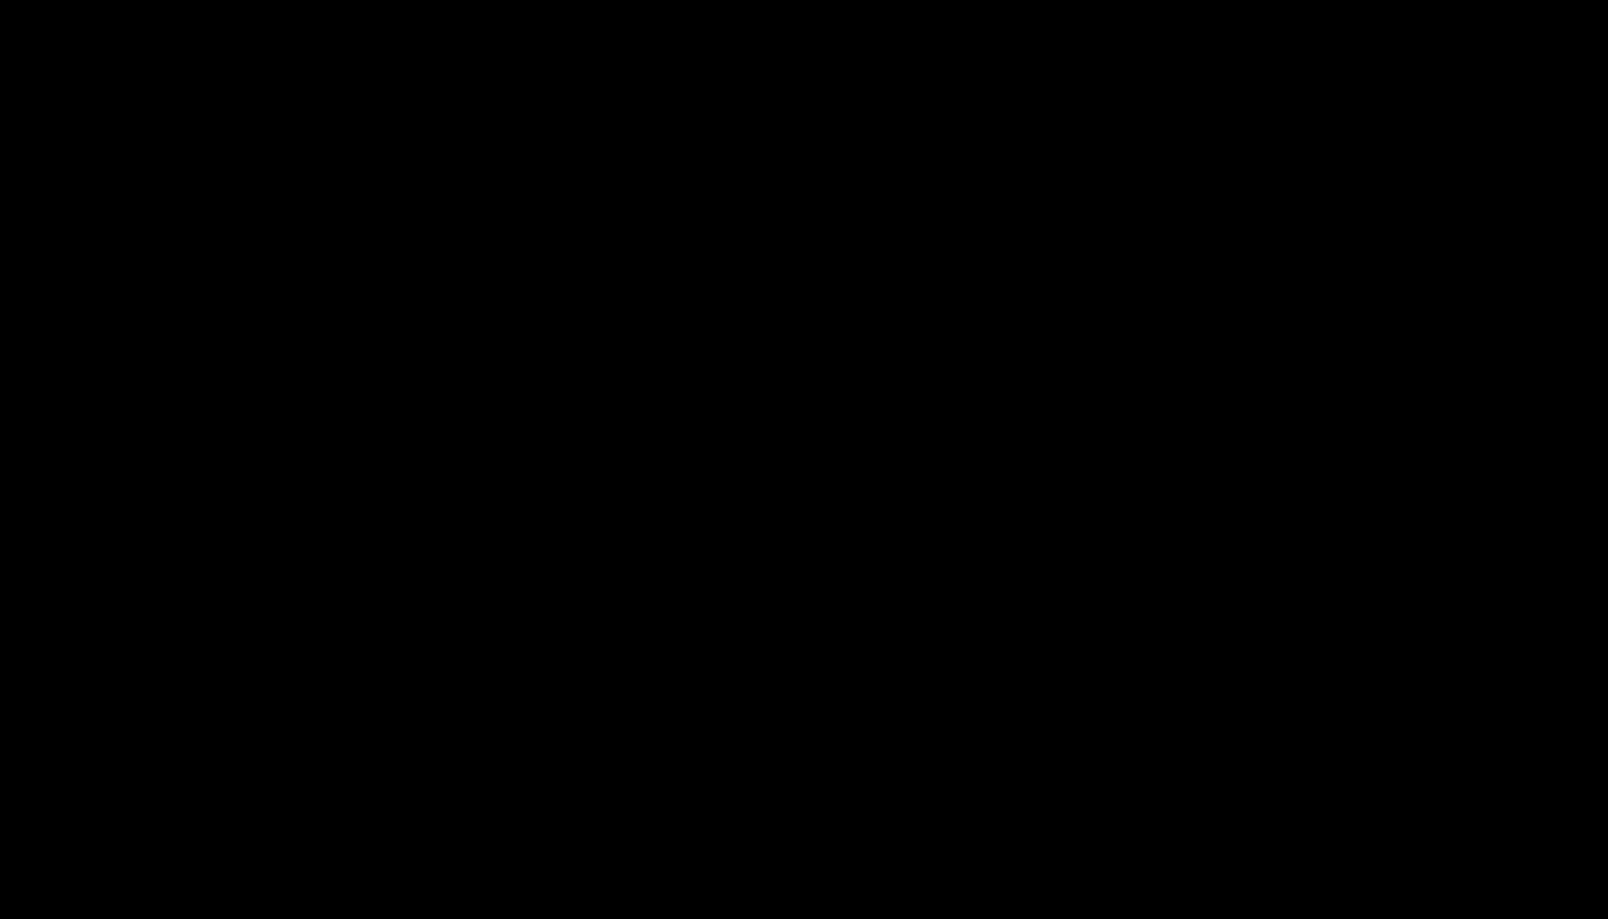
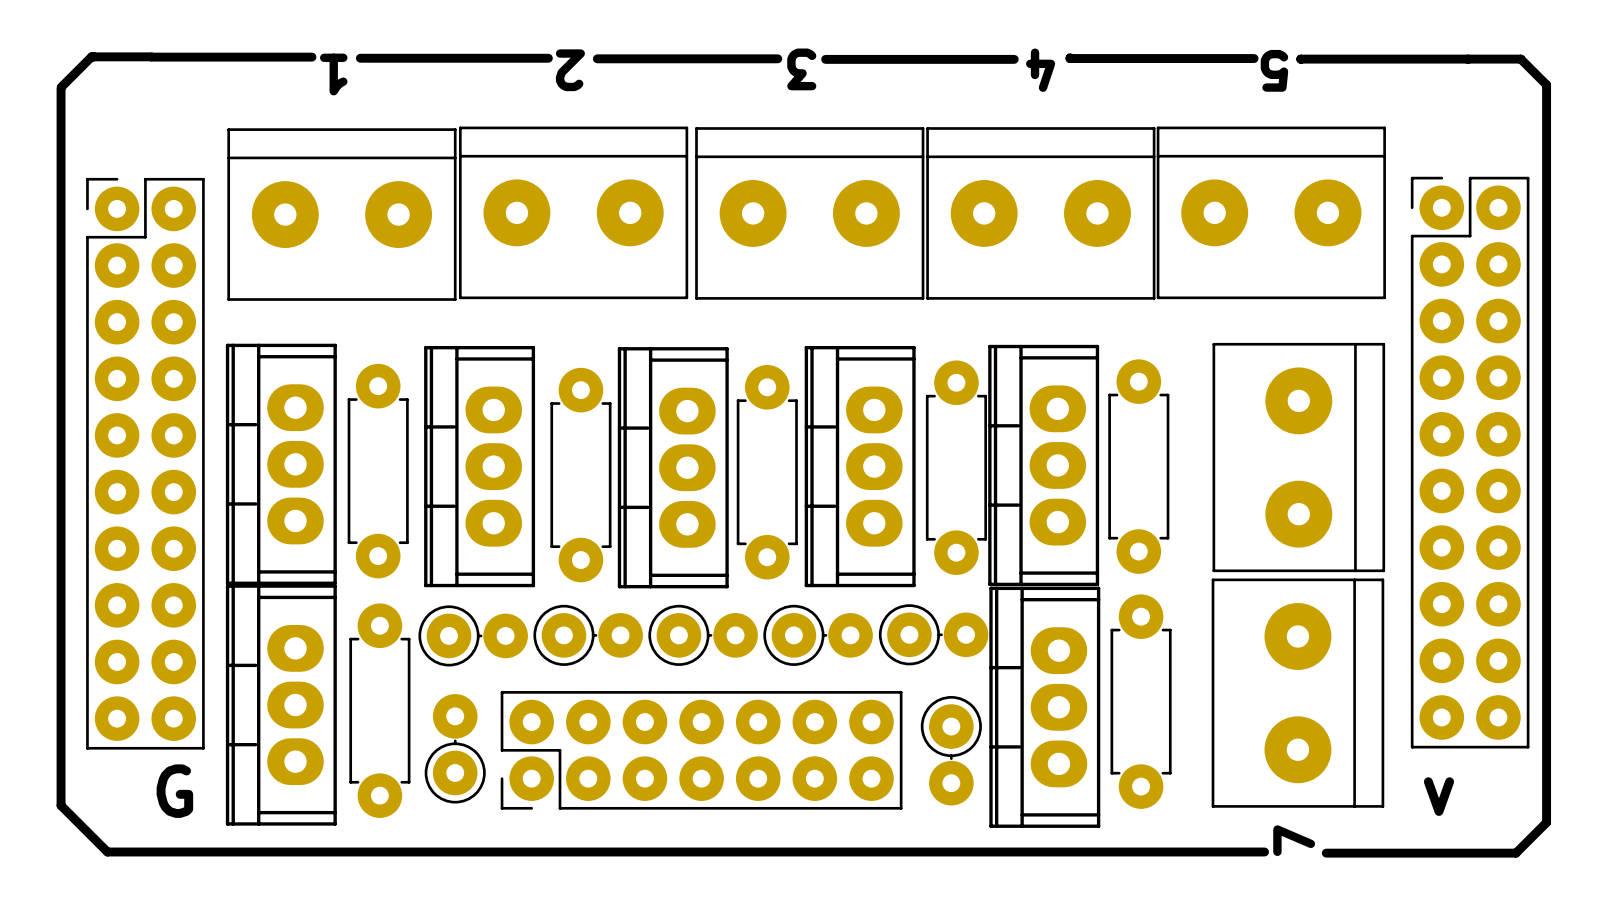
line: none -> (151, 56) (91, 56) (61, 87)
line: none -> (151, 57) (311, 57)
line: none -> (1070, 57) (1254, 58)
line: none -> (360, 58) (548, 58)
line: none -> (597, 58) (777, 58)
line: none -> (825, 59) (1014, 59)
line: none -> (1300, 59) (1520, 59) (1546, 84) (1546, 822) (1516, 853) (1326, 853)
text: none -> 3 (801, 69)
text: none -> 4 (1040, 70)
text: none -> 2 (570, 70)
text: none -> 5 (1274, 70)
text: none -> 1 (333, 74)
line: none -> (61, 88) (61, 805) (107, 851) (1264, 851)
part: none -> (573, 212)
part: none -> (1271, 212)
part: none -> (809, 213)
part: none -> (1040, 213)
part: none -> (341, 214)
part: none -> (1298, 457)
part: none -> (1470, 462)
part: none -> (145, 463)
part: none -> (281, 464)
part: none -> (1043, 465)
part: none -> (479, 466)
part: none -> (860, 466)
part: none -> (1138, 466)
part: none -> (673, 467)
part: none -> (956, 467)
part: none -> (378, 471)
part: none -> (767, 472)
part: none -> (580, 475)
part: none -> (933, 634)
part: none -> (473, 635)
part: none -> (588, 635)
part: none -> (703, 635)
part: none -> (818, 635)
part: none -> (1297, 693)
part: none -> (1141, 701)
part: none -> (281, 705)
part: none -> (1044, 707)
part: none -> (379, 710)
part: none -> (455, 748)
part: none -> (701, 750)
part: none -> (951, 750)
text: none -> G (174, 791)
text: none -> v (1438, 796)
text: none -> 7 (1294, 840)

